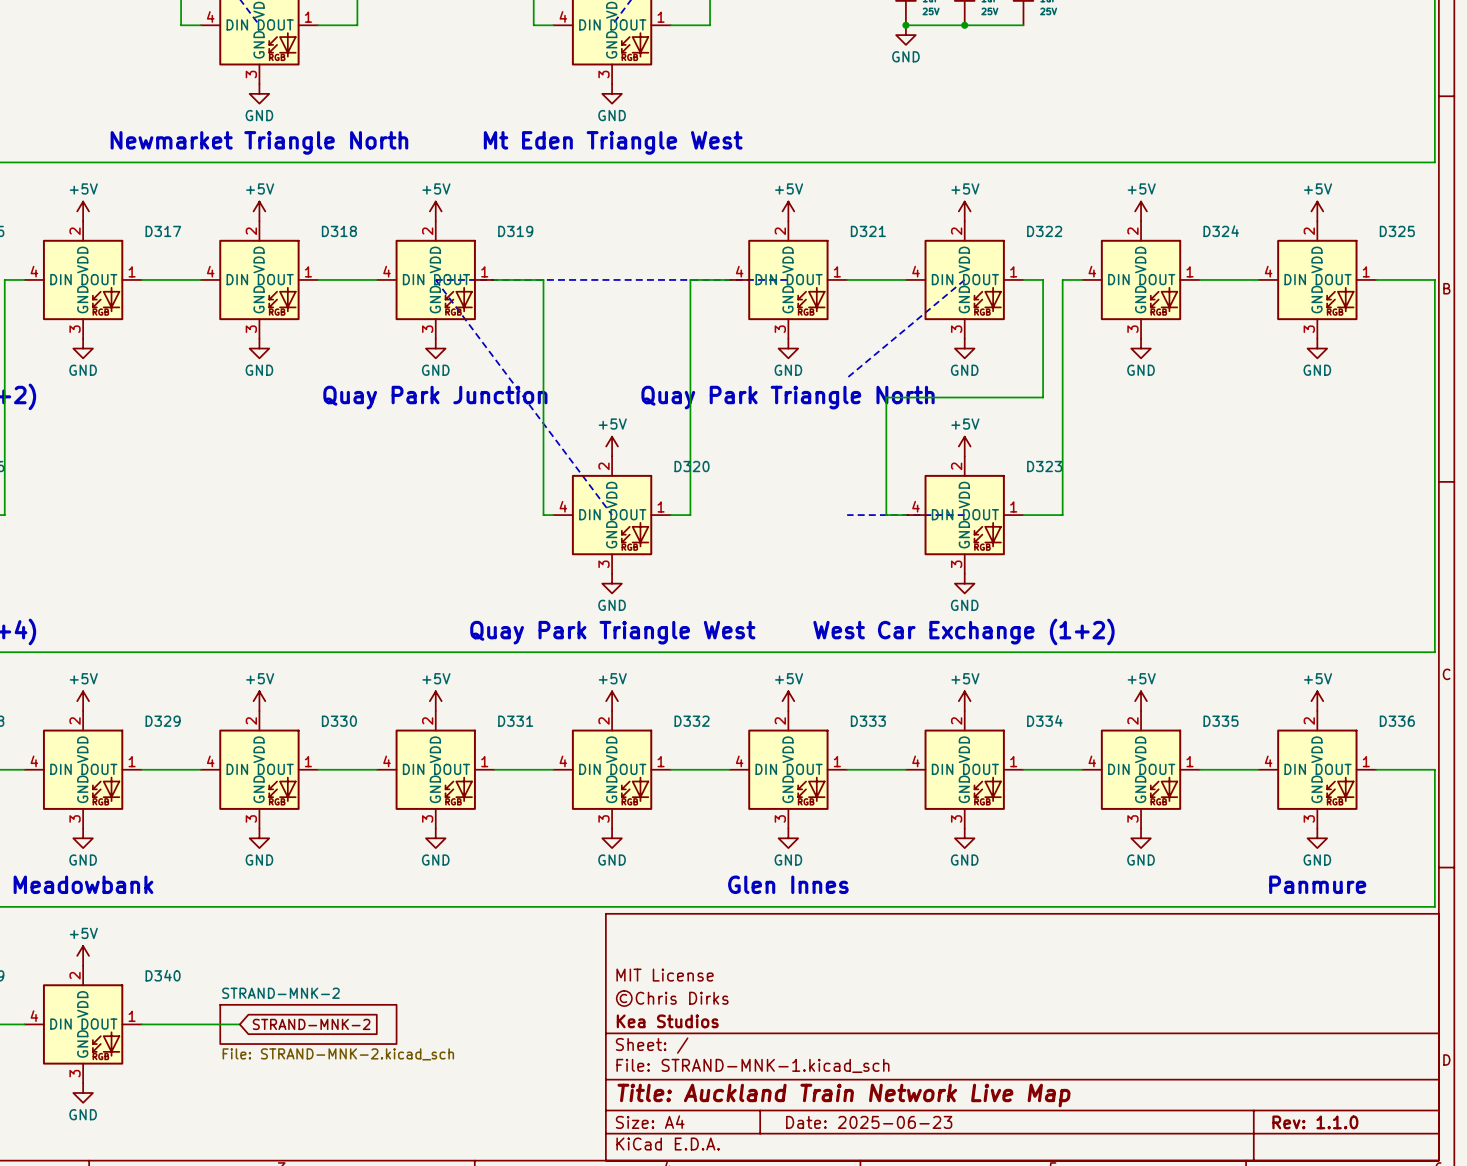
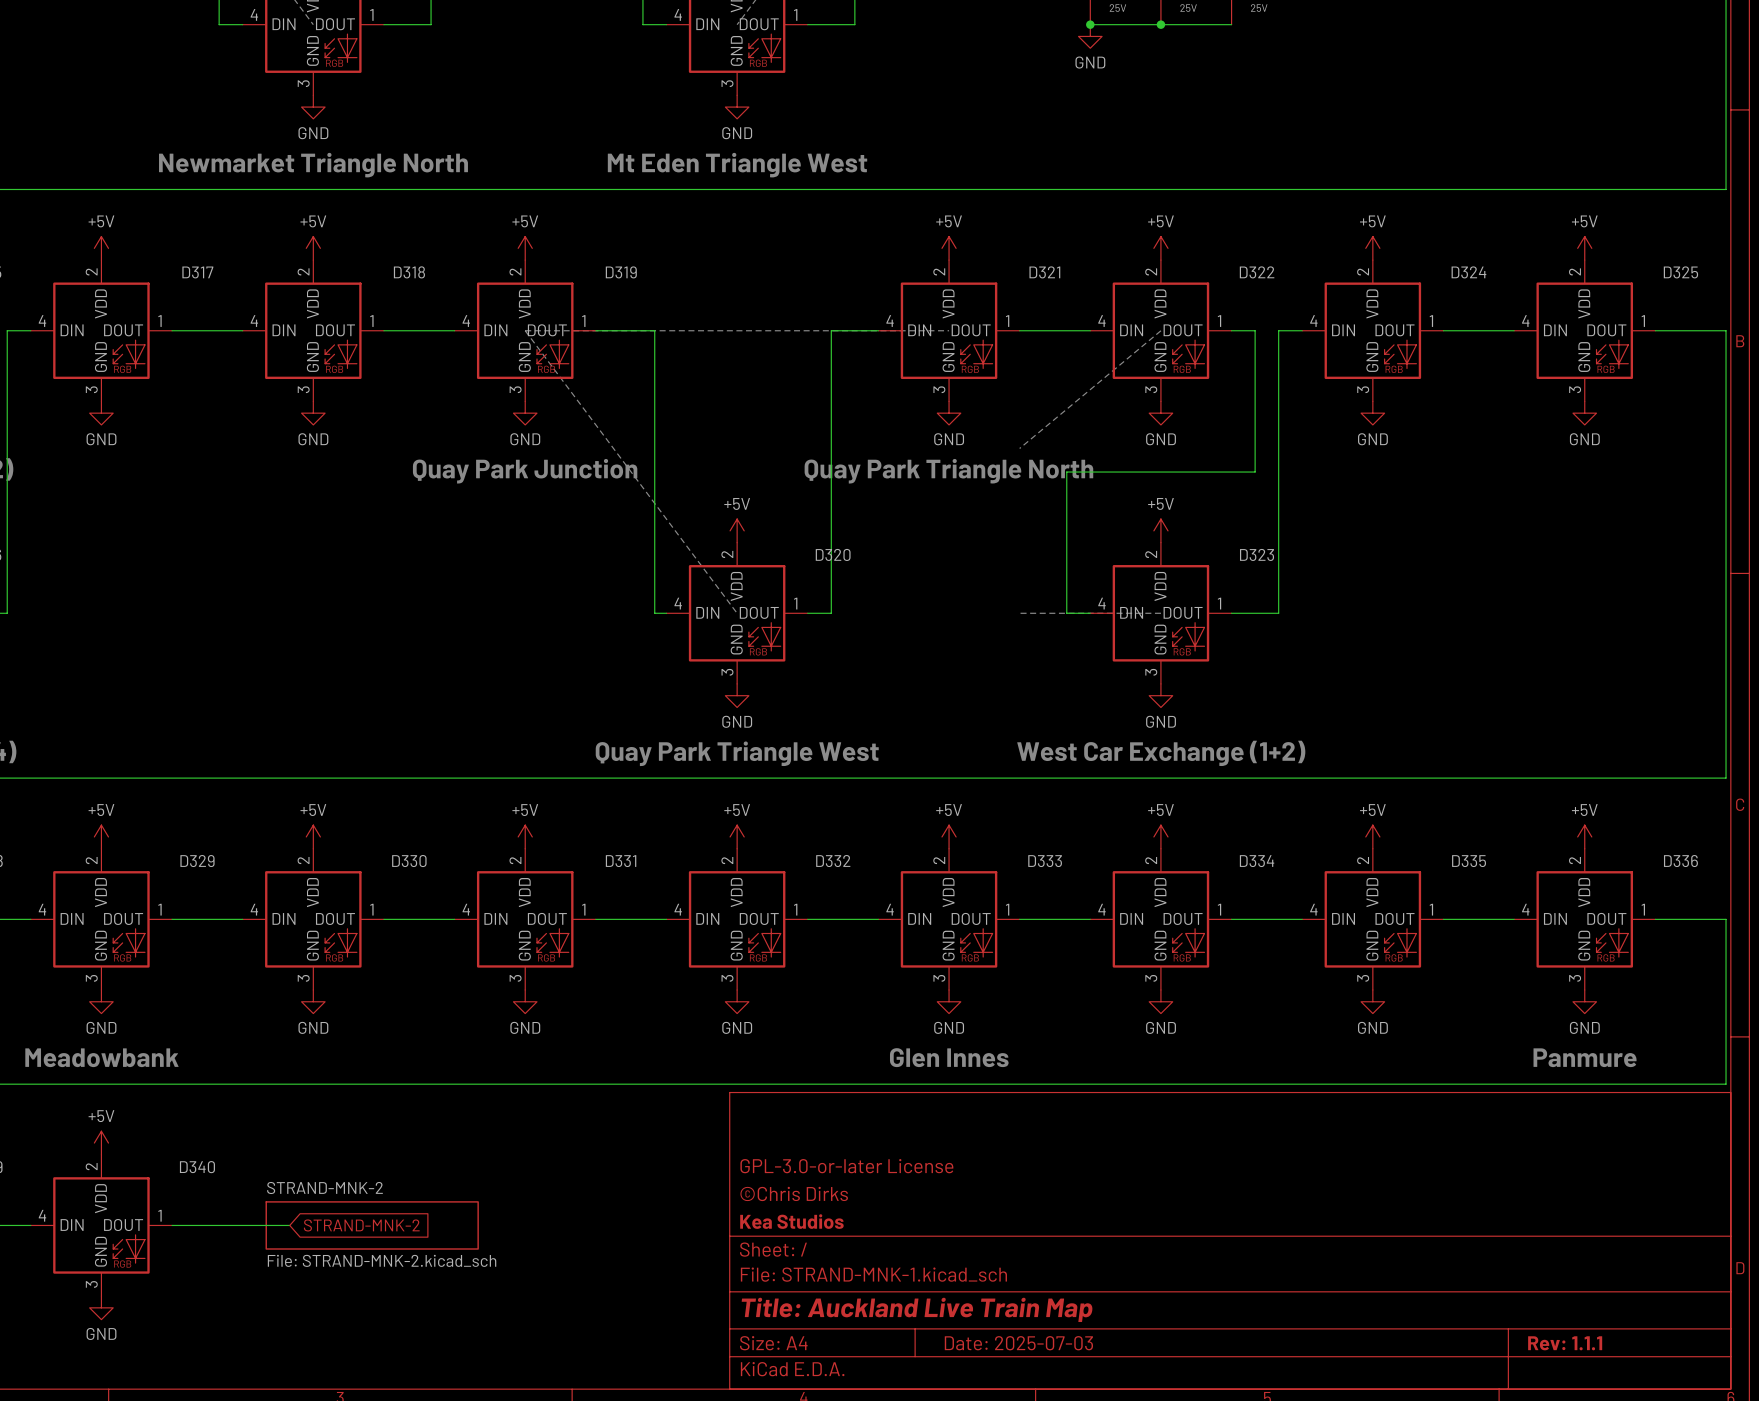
title block: MIT License (665, 975) -> GPL-3.0-or-later License (846, 1166)
title block: Title: Auckland Train Network Live Map (844, 1095) -> Title: Auckland Live Train Map (917, 1309)
title block: Date: 2025-06-23 (869, 1122) -> Date: 2025-07-03 (1018, 1343)
title block: Rev: 1.1.0 (1315, 1122) -> Rev: 1.1.1 (1565, 1343)

